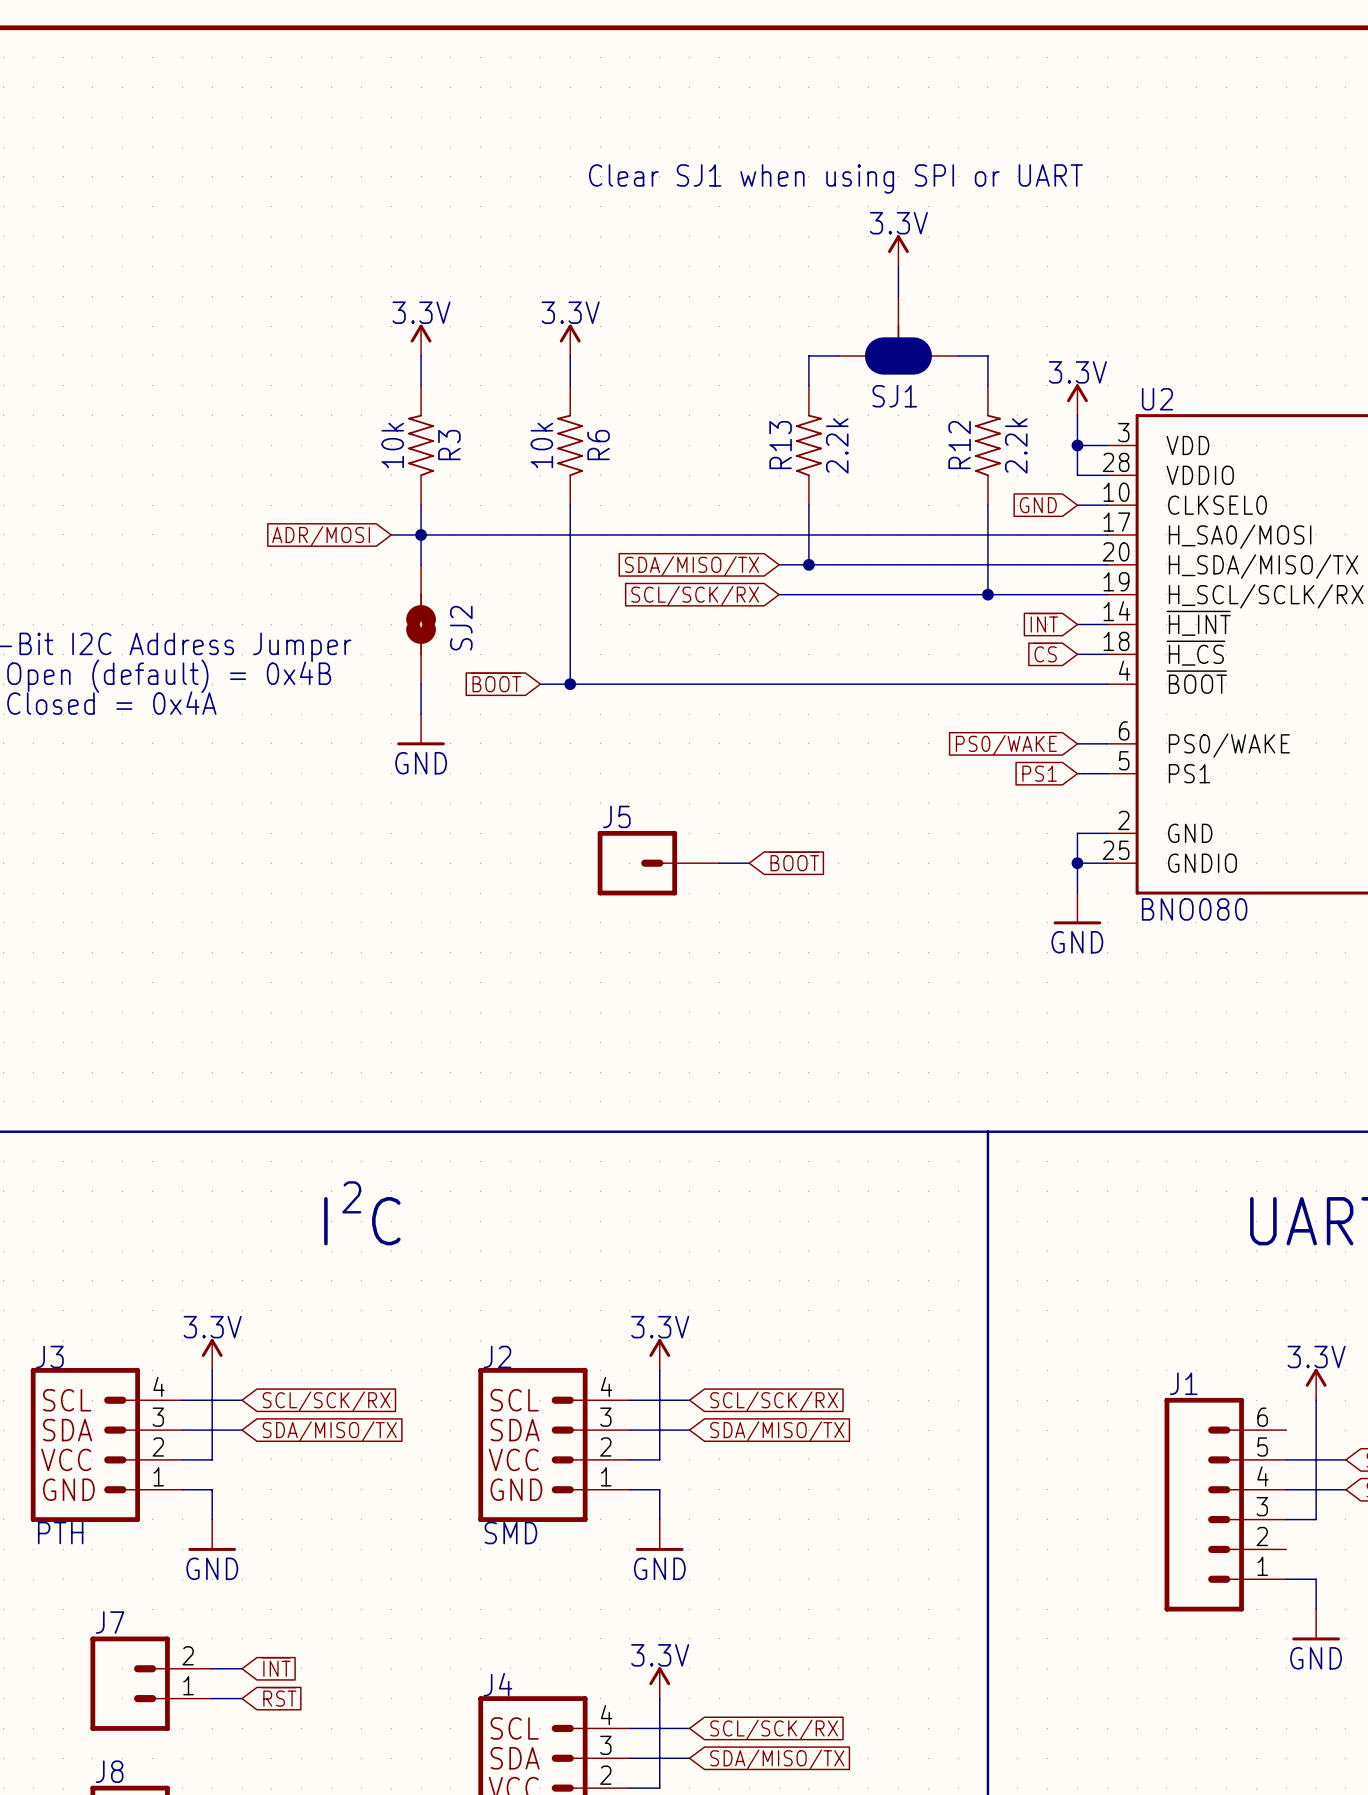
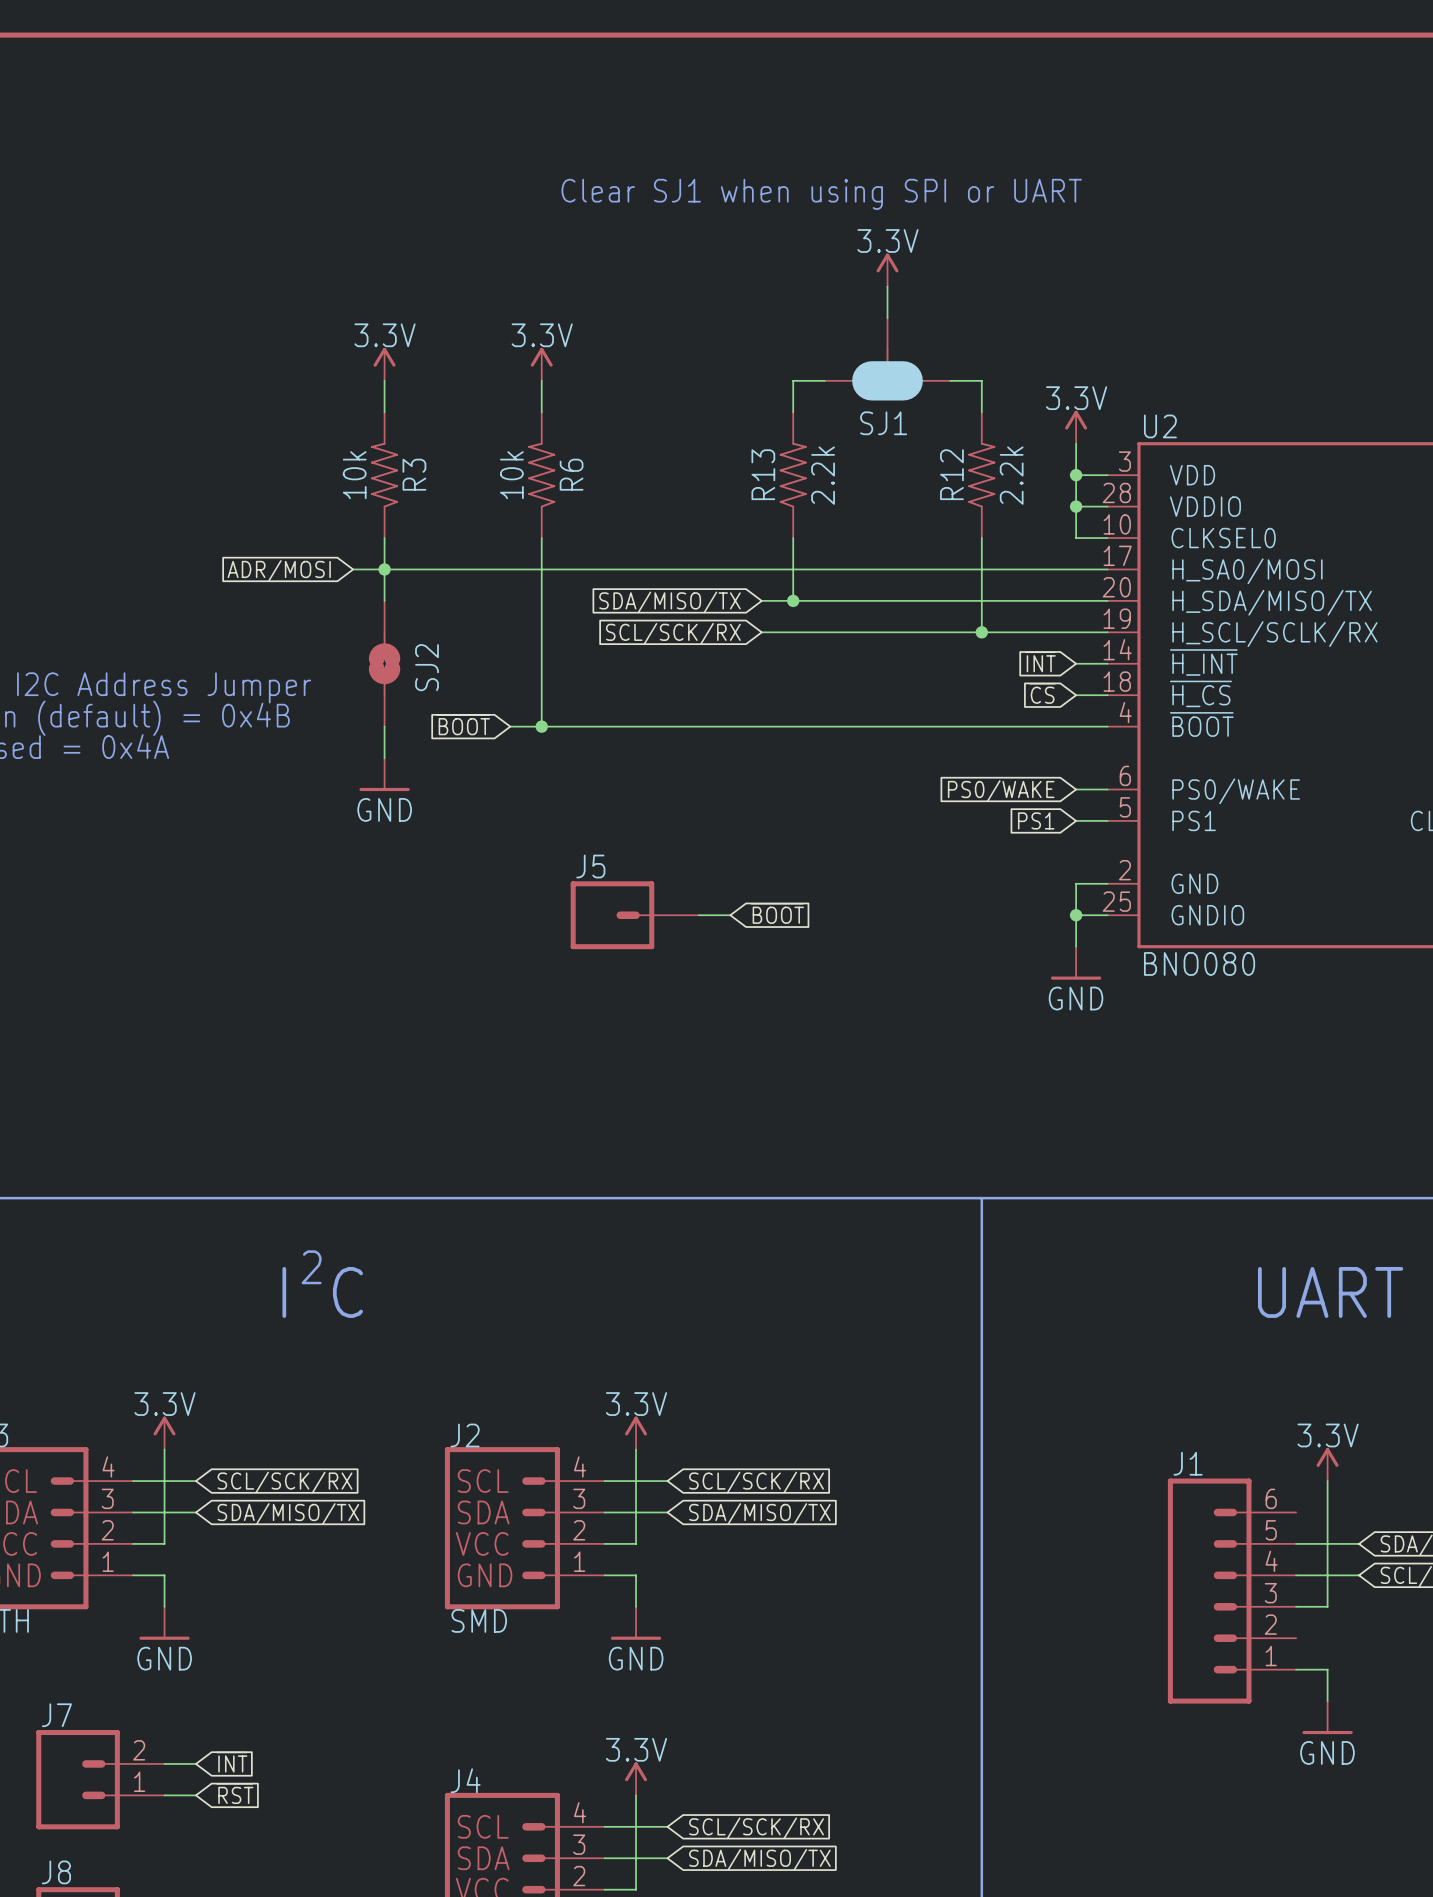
wire: none -> (1076, 506) (1076, 538)
junction: none -> (1076, 506)
global label: GND (1038, 505) -> none

